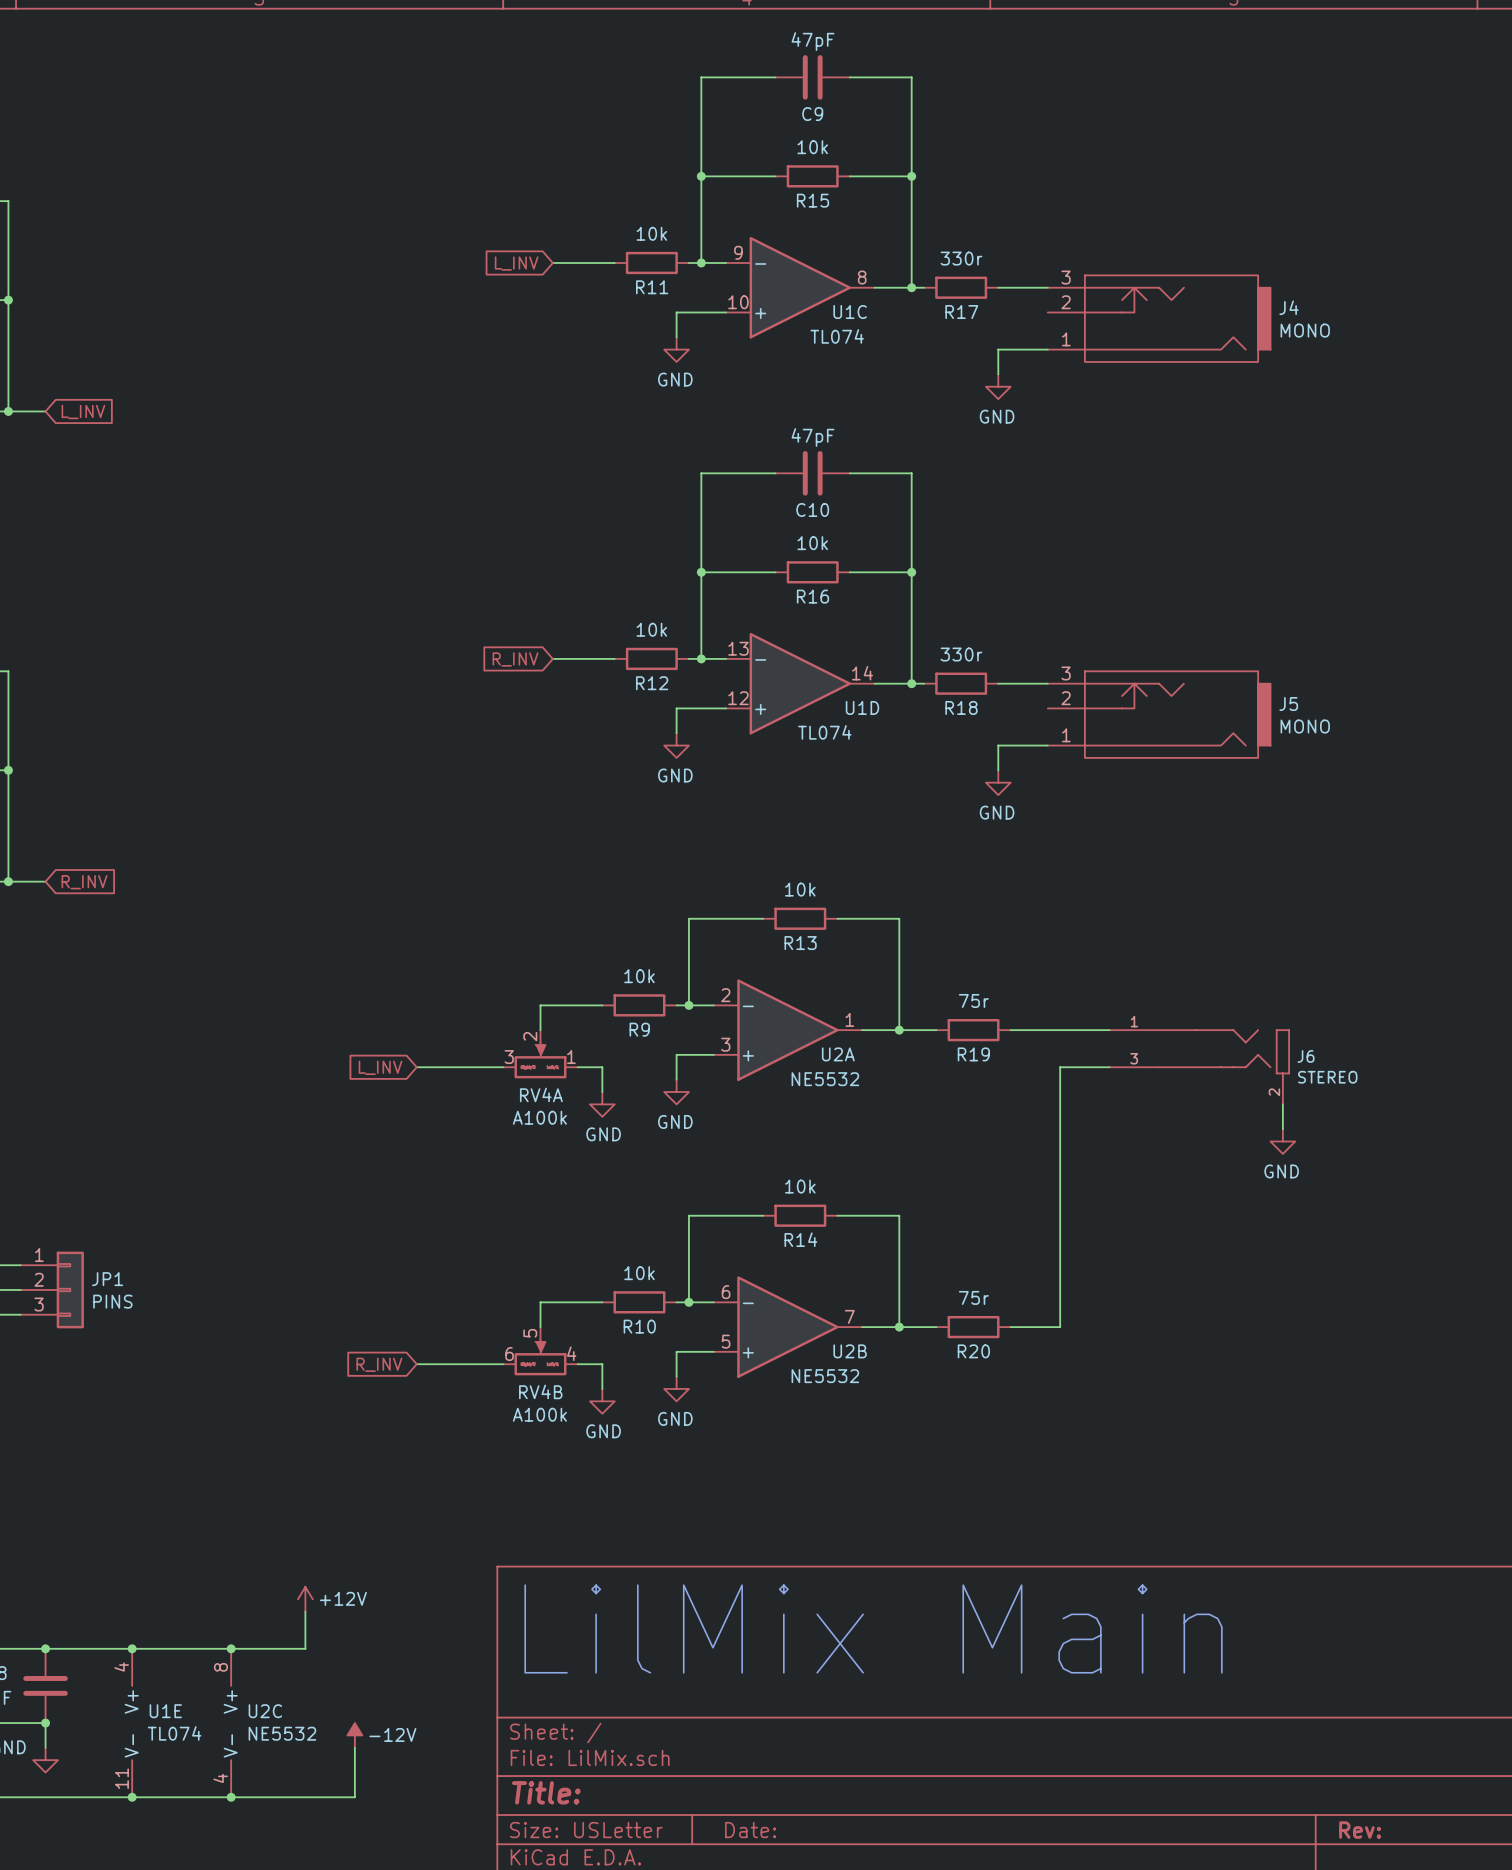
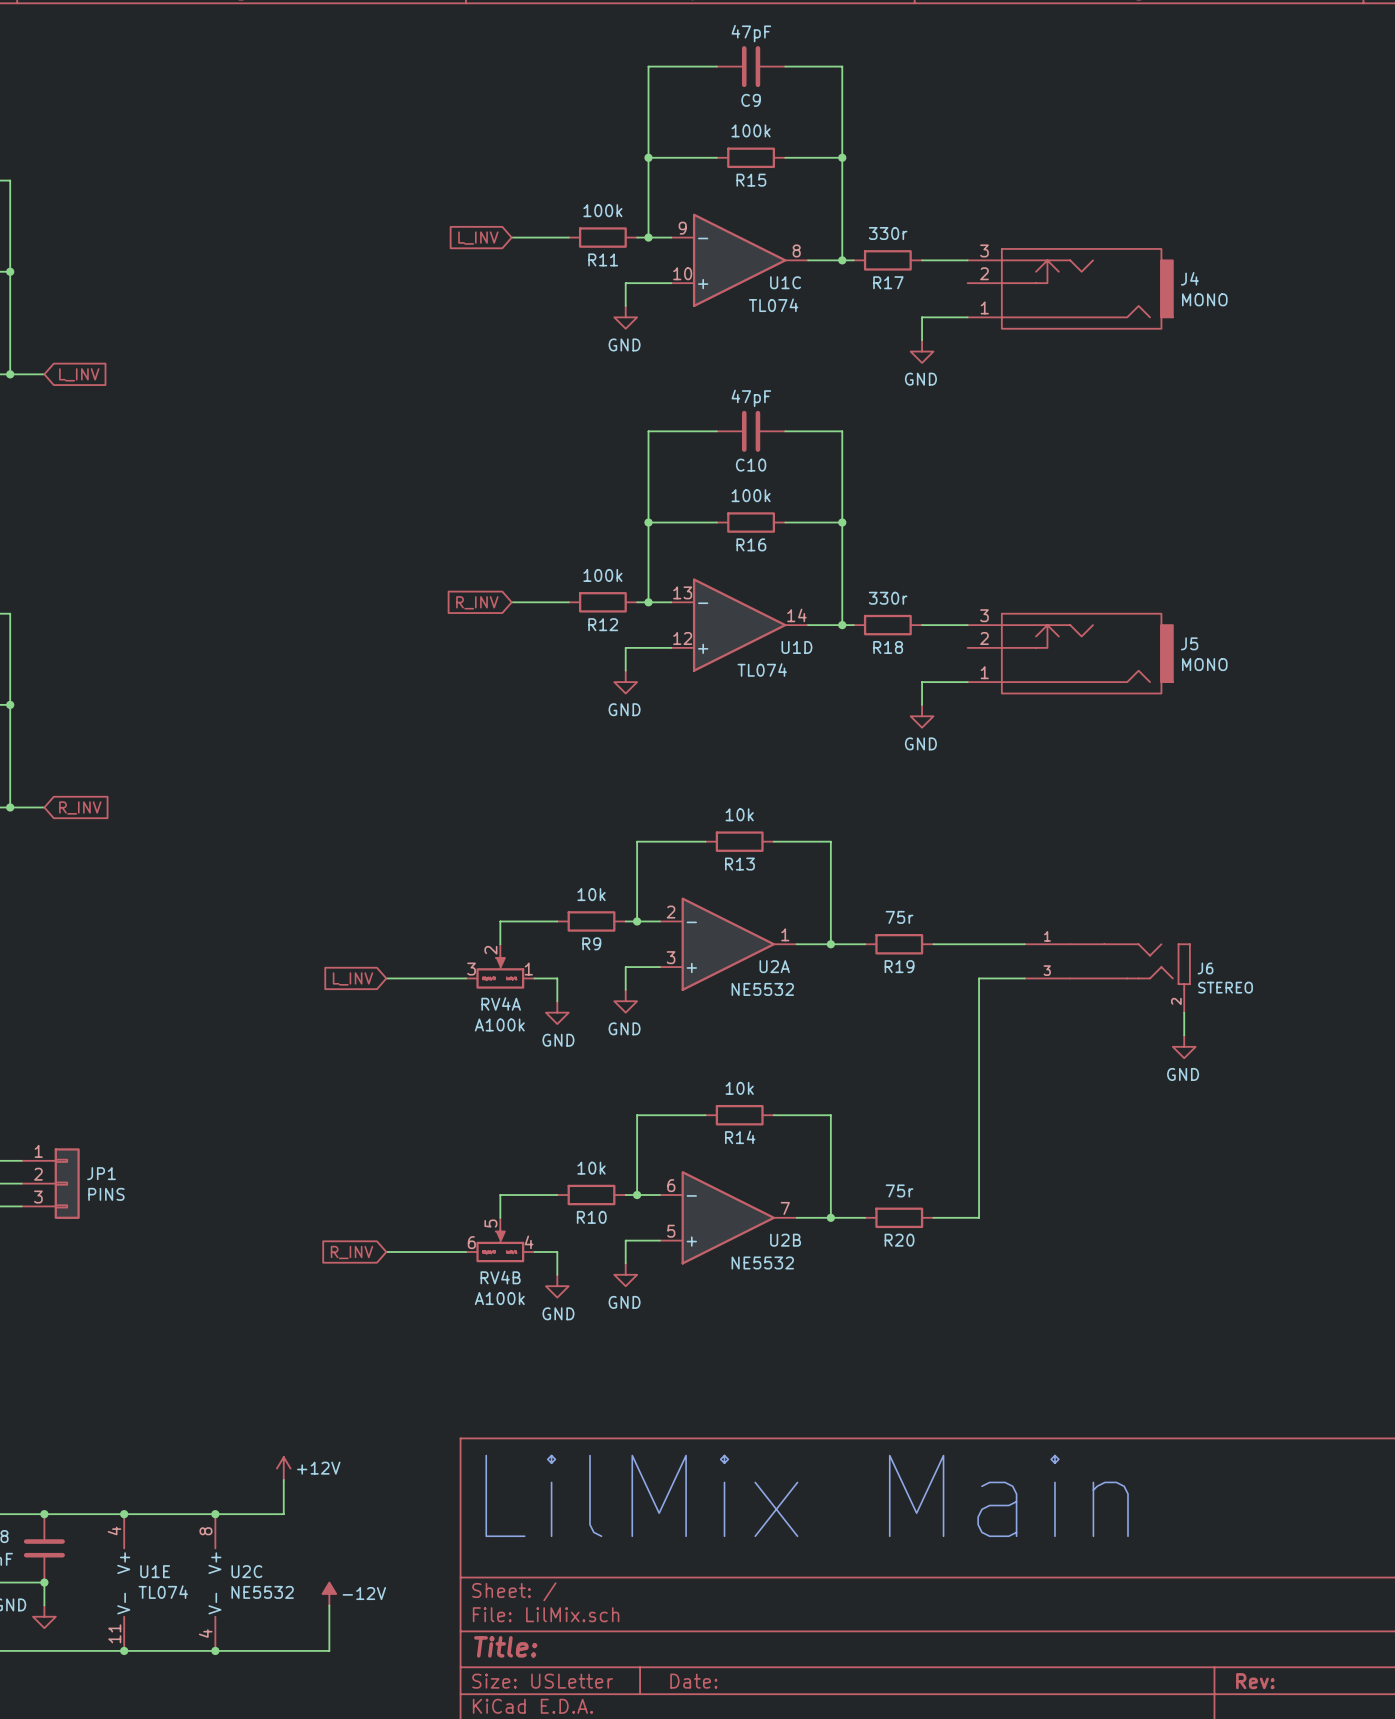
R15 value: 10k (812, 147) -> 100k (751, 130)
R11 value: 10k (651, 233) -> 100k (602, 210)
R16 value: 10k (812, 543) -> 100k (751, 495)
R12 value: 10k (651, 629) -> 100k (602, 575)

